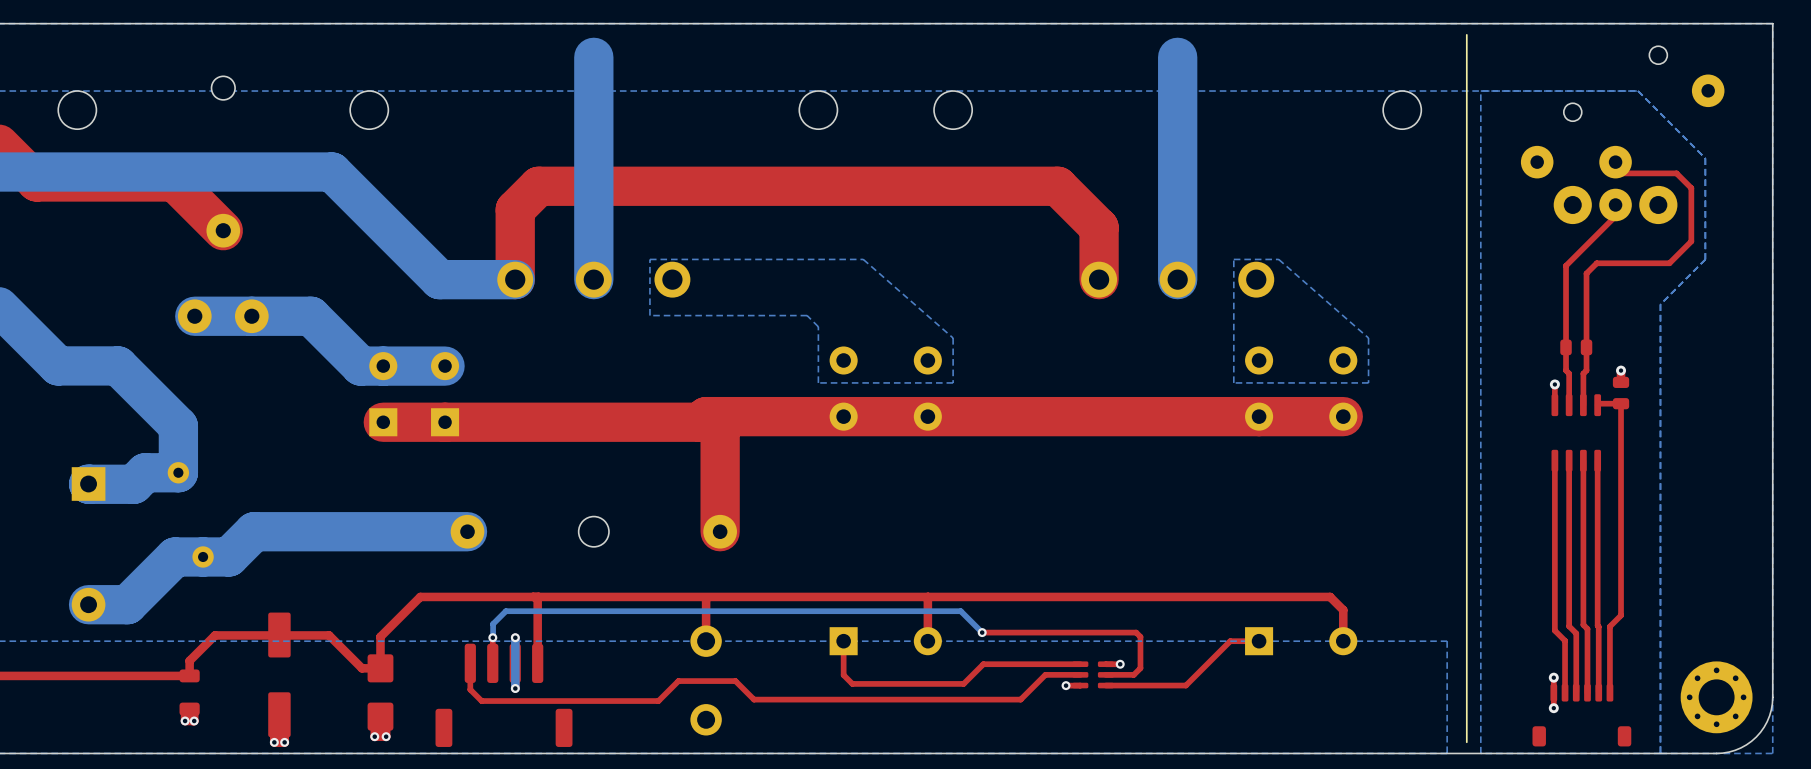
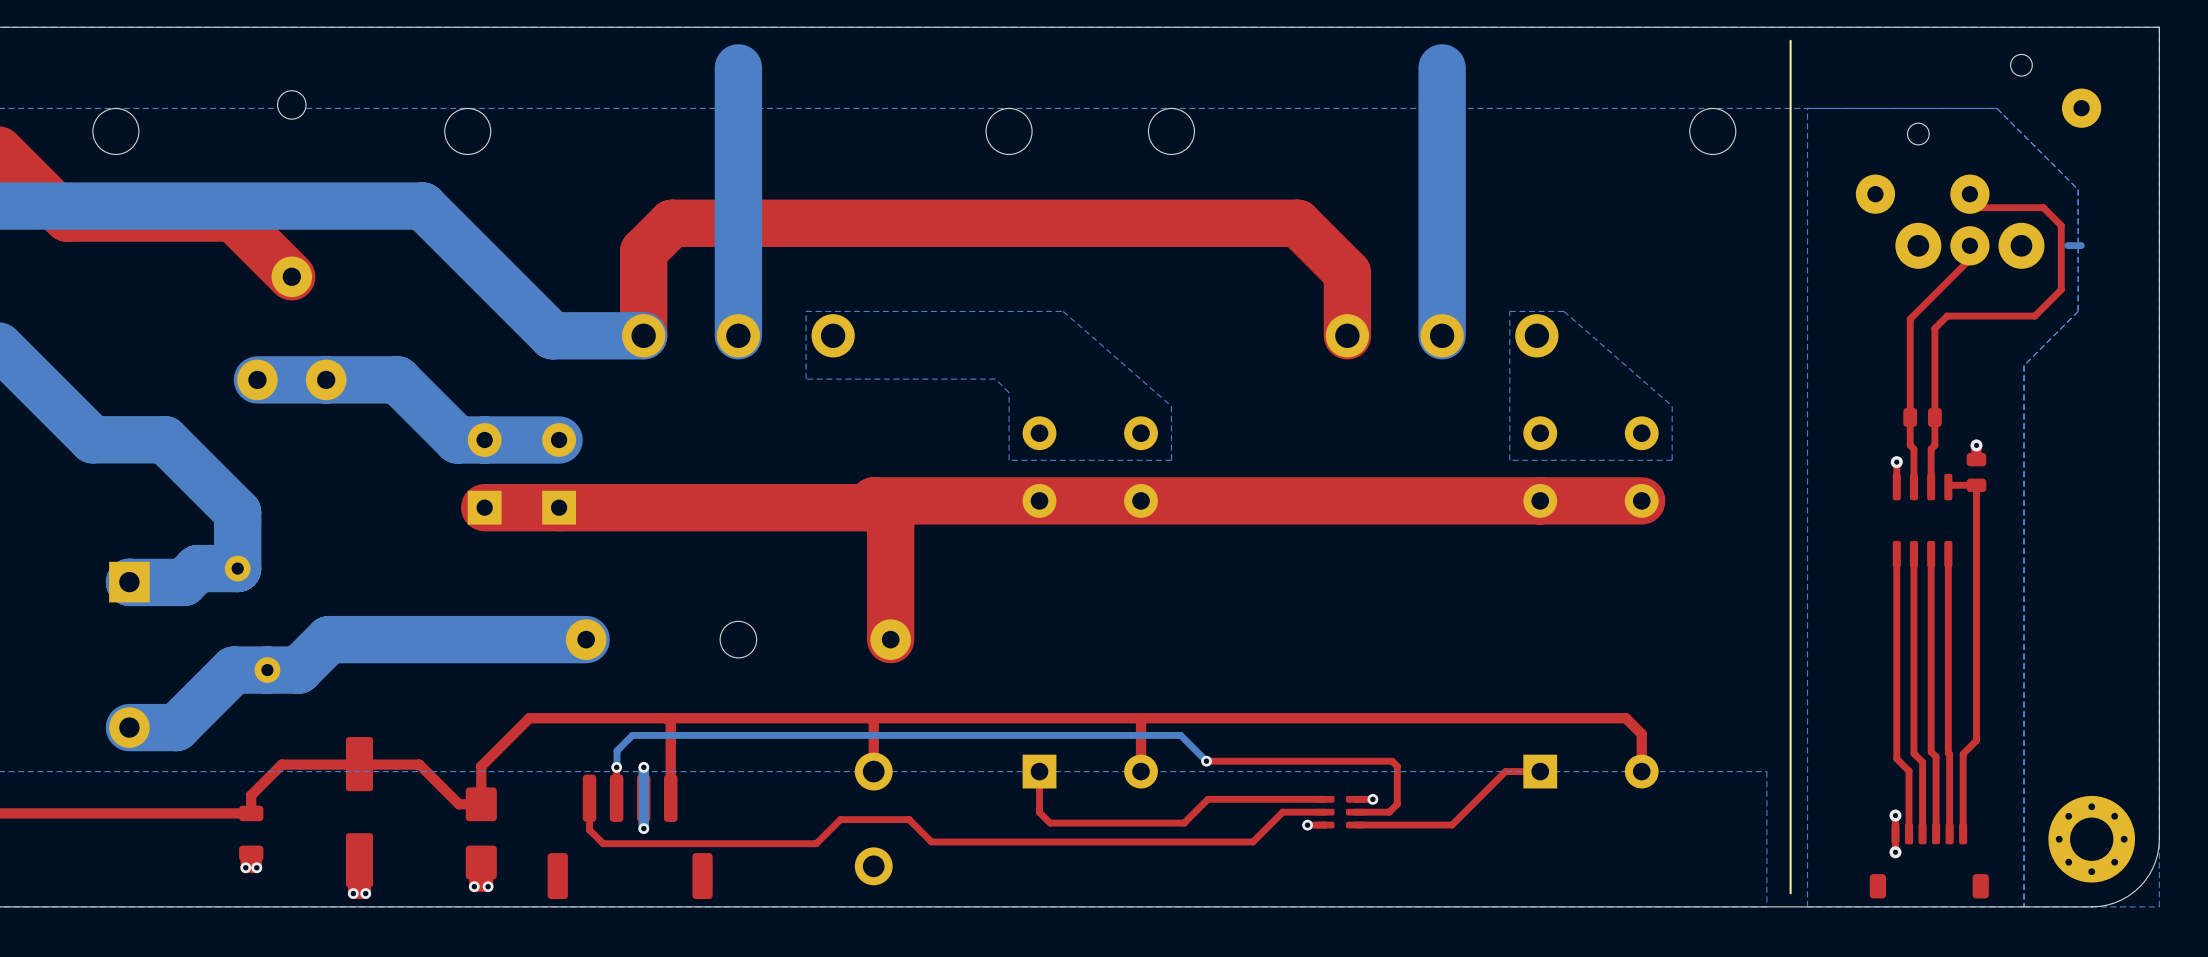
part: none -> (2074, 245)

